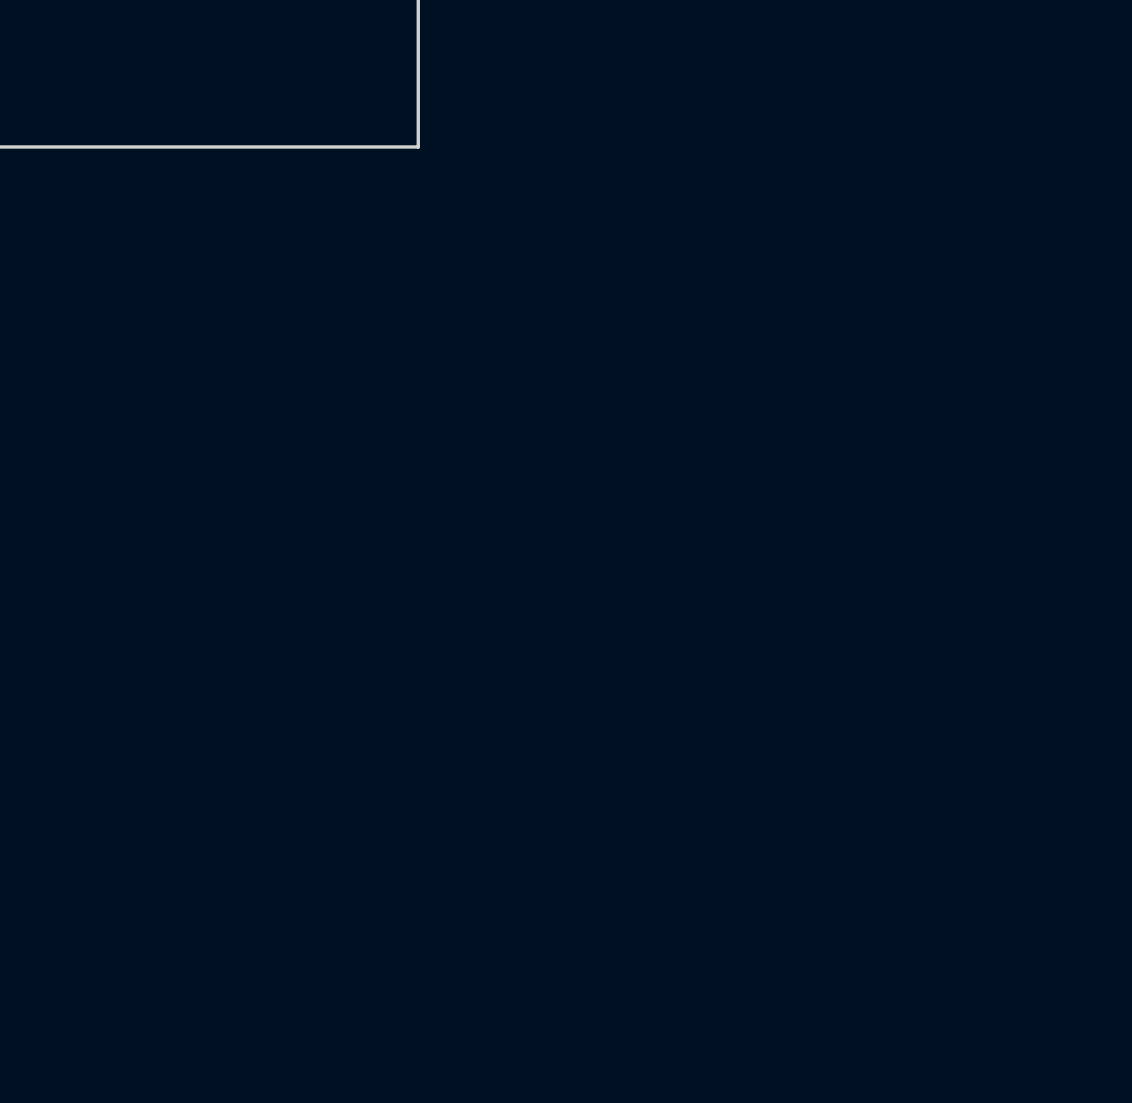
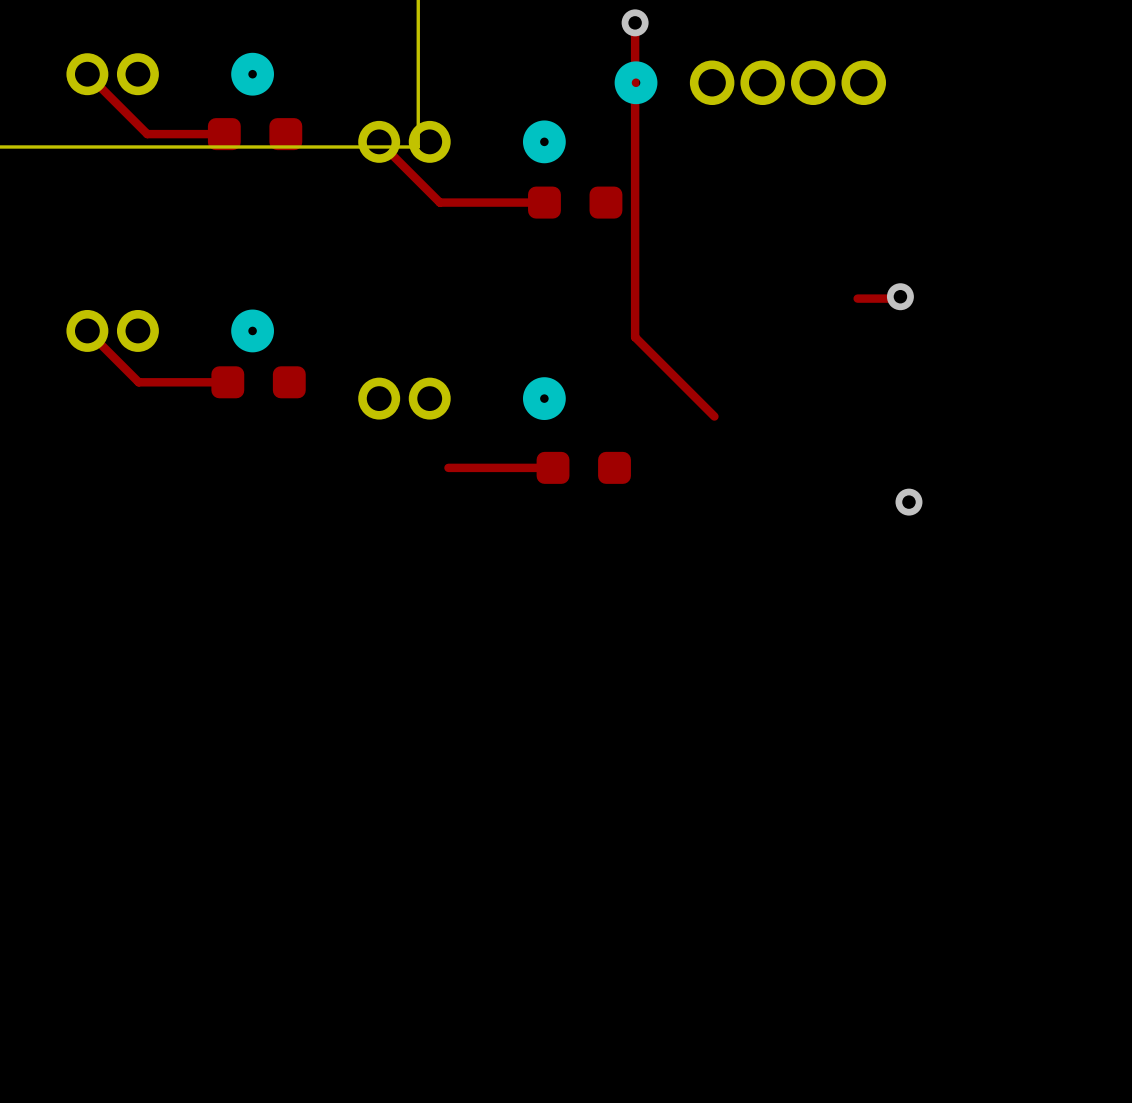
top track: none -> (635, 22) (635, 337) (714, 416)
via: none -> (635, 22)
top track: none -> (87, 74) (147, 134) (224, 134)
part: none -> (170, 74)
part: none -> (750, 82)
part: none -> (255, 134)
top track: none -> (379, 141) (439, 202) (544, 202)
part: none -> (461, 141)
part: none -> (575, 202)
top track: none -> (900, 296) (898, 298) (857, 298)
via: none -> (900, 296)
top track: none -> (87, 330) (138, 382) (227, 382)
part: none -> (170, 330)
part: none -> (258, 382)
part: none -> (461, 398)
top track: none -> (553, 467) (448, 467)
part: none -> (583, 467)
via: none -> (908, 502)

